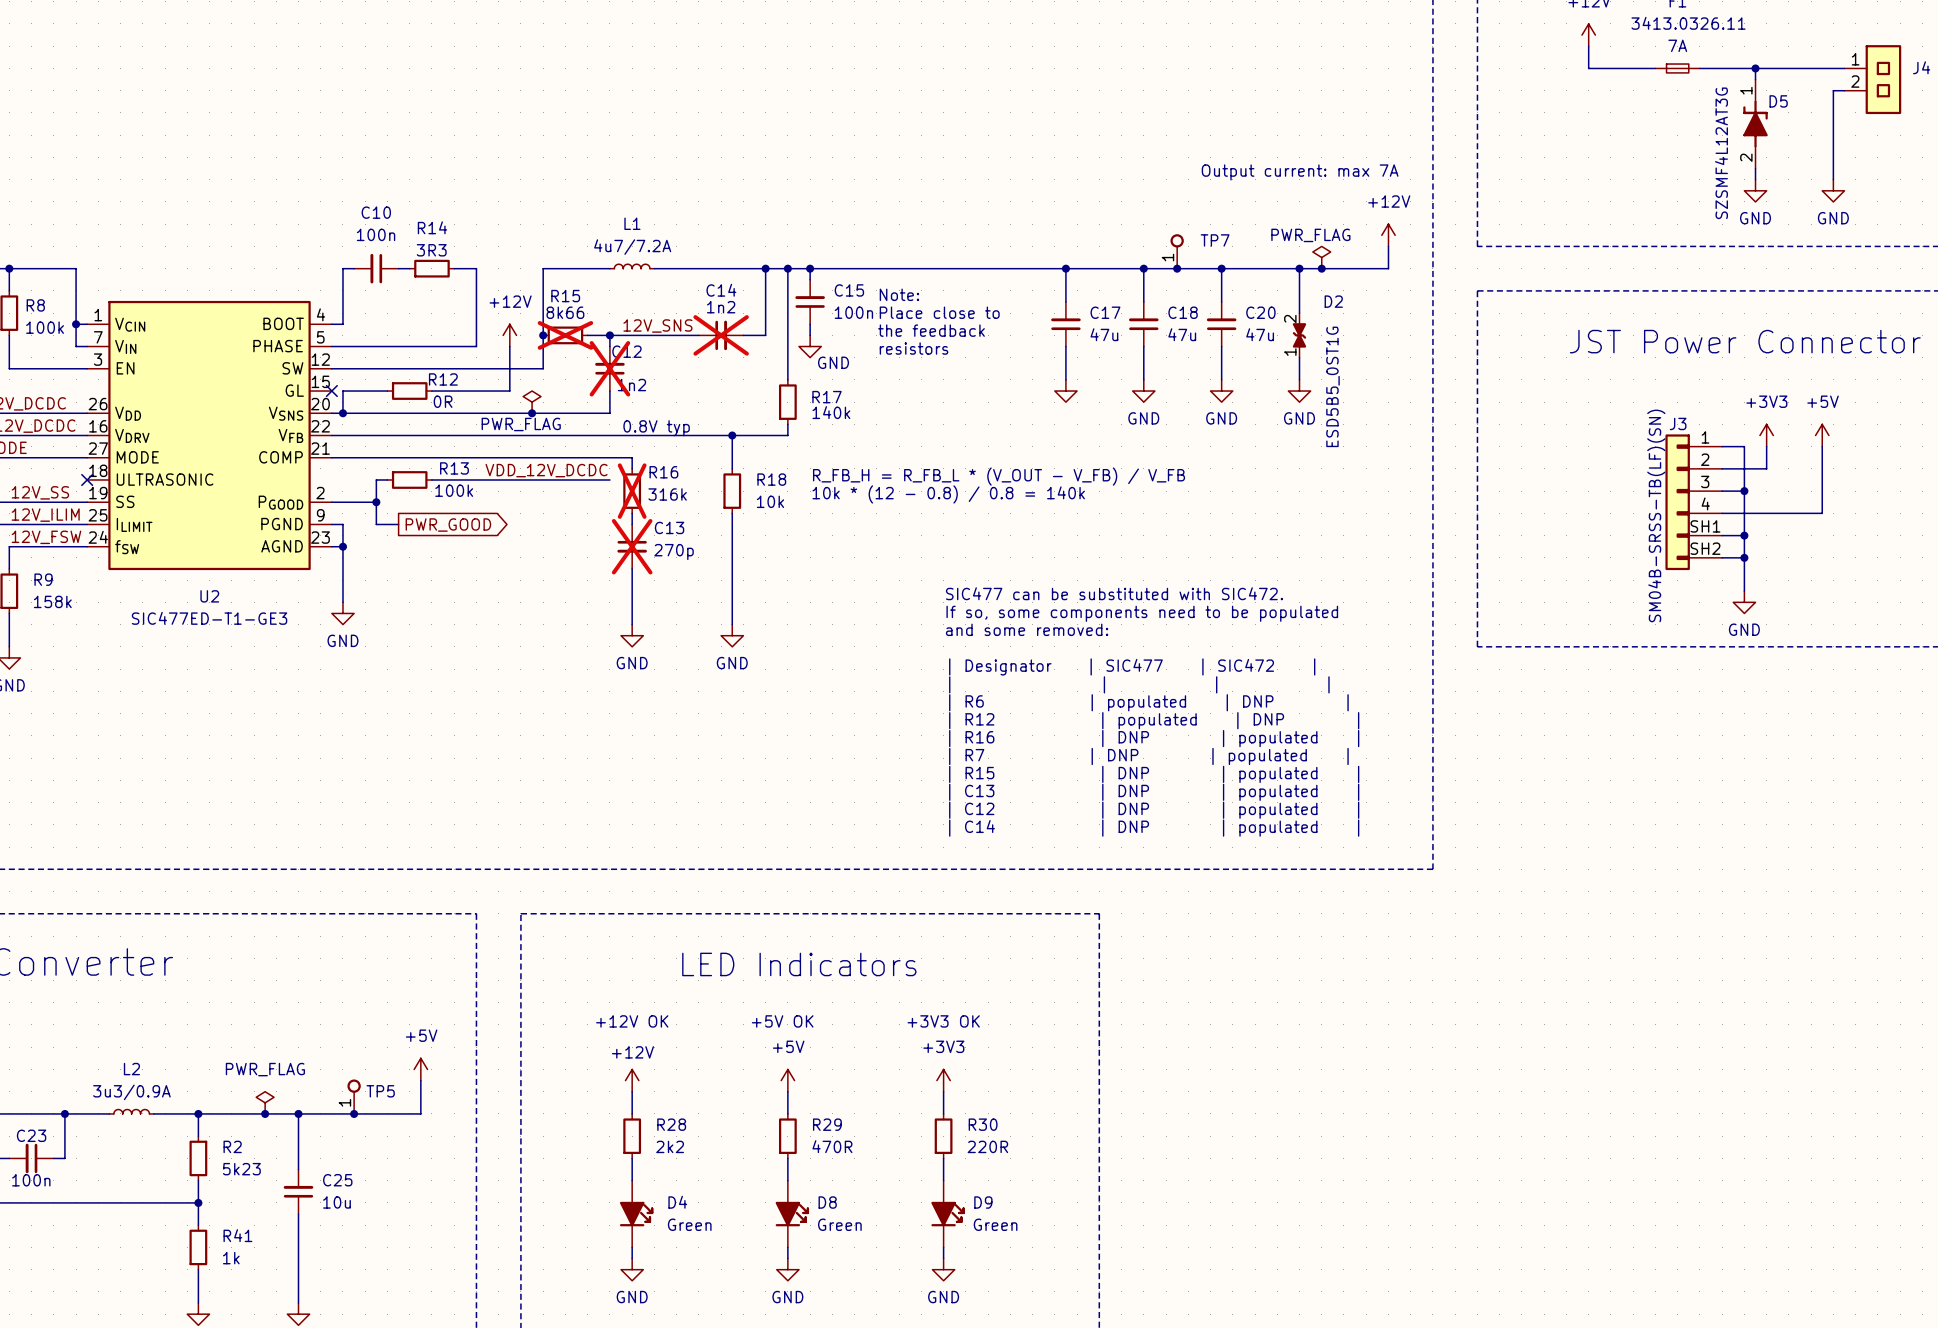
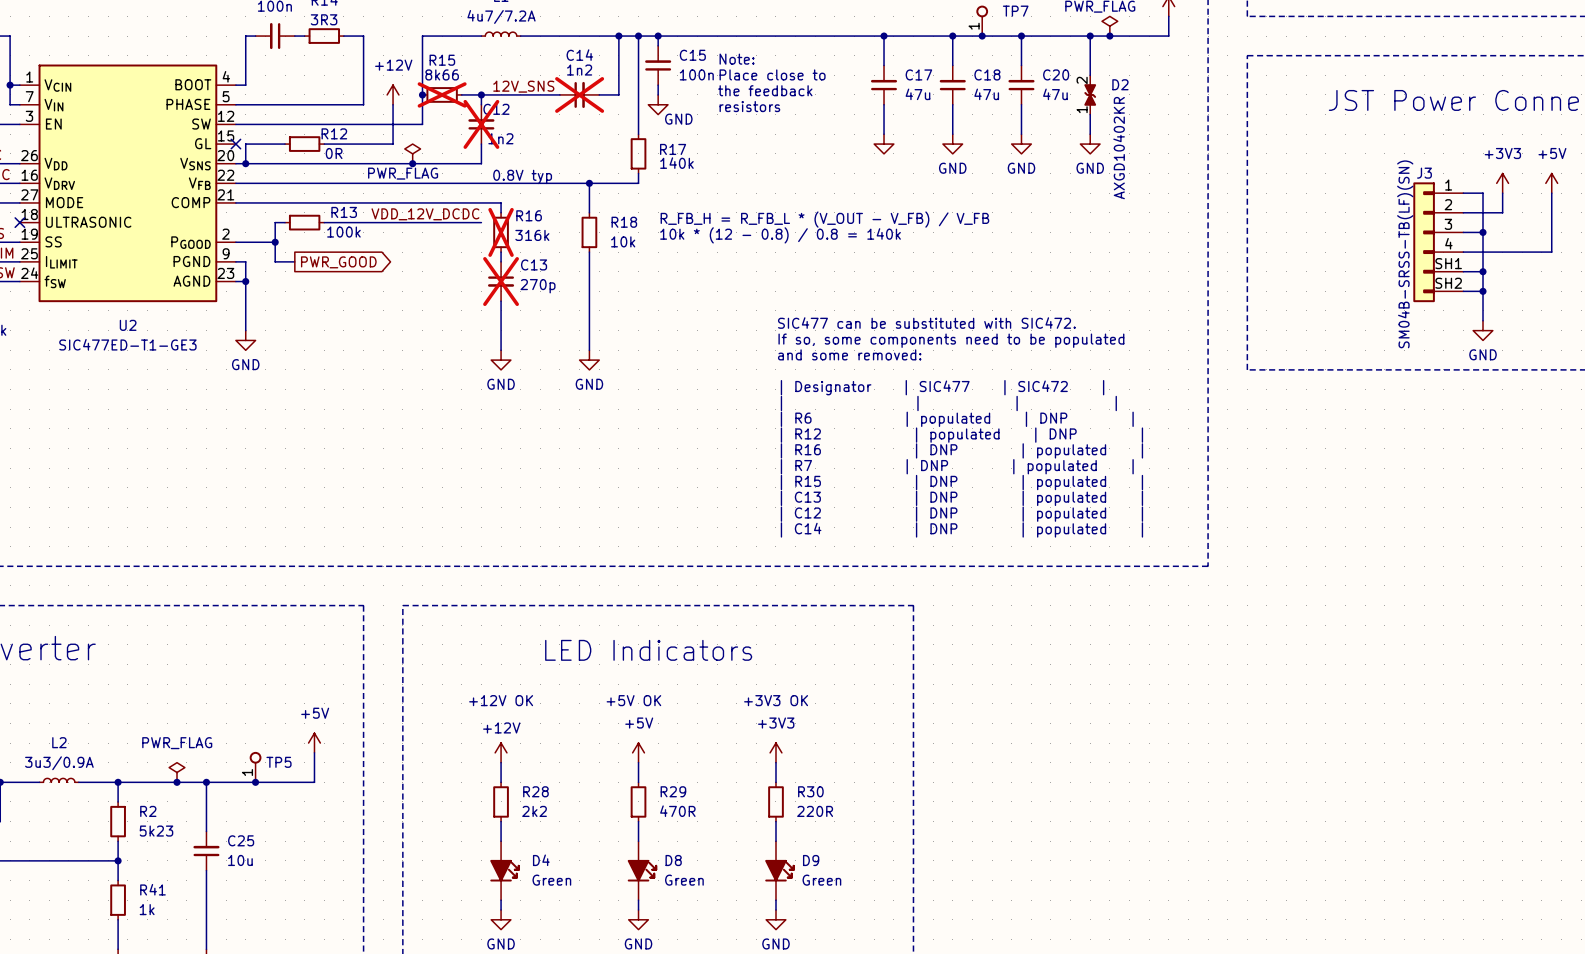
D2 name position: D2 (1333, 301) -> D2 (1120, 84)
D2 value: ESD5B5_0ST1G (1332, 386) -> none
D2 text: none -> AXGD10402KR (1119, 148)

